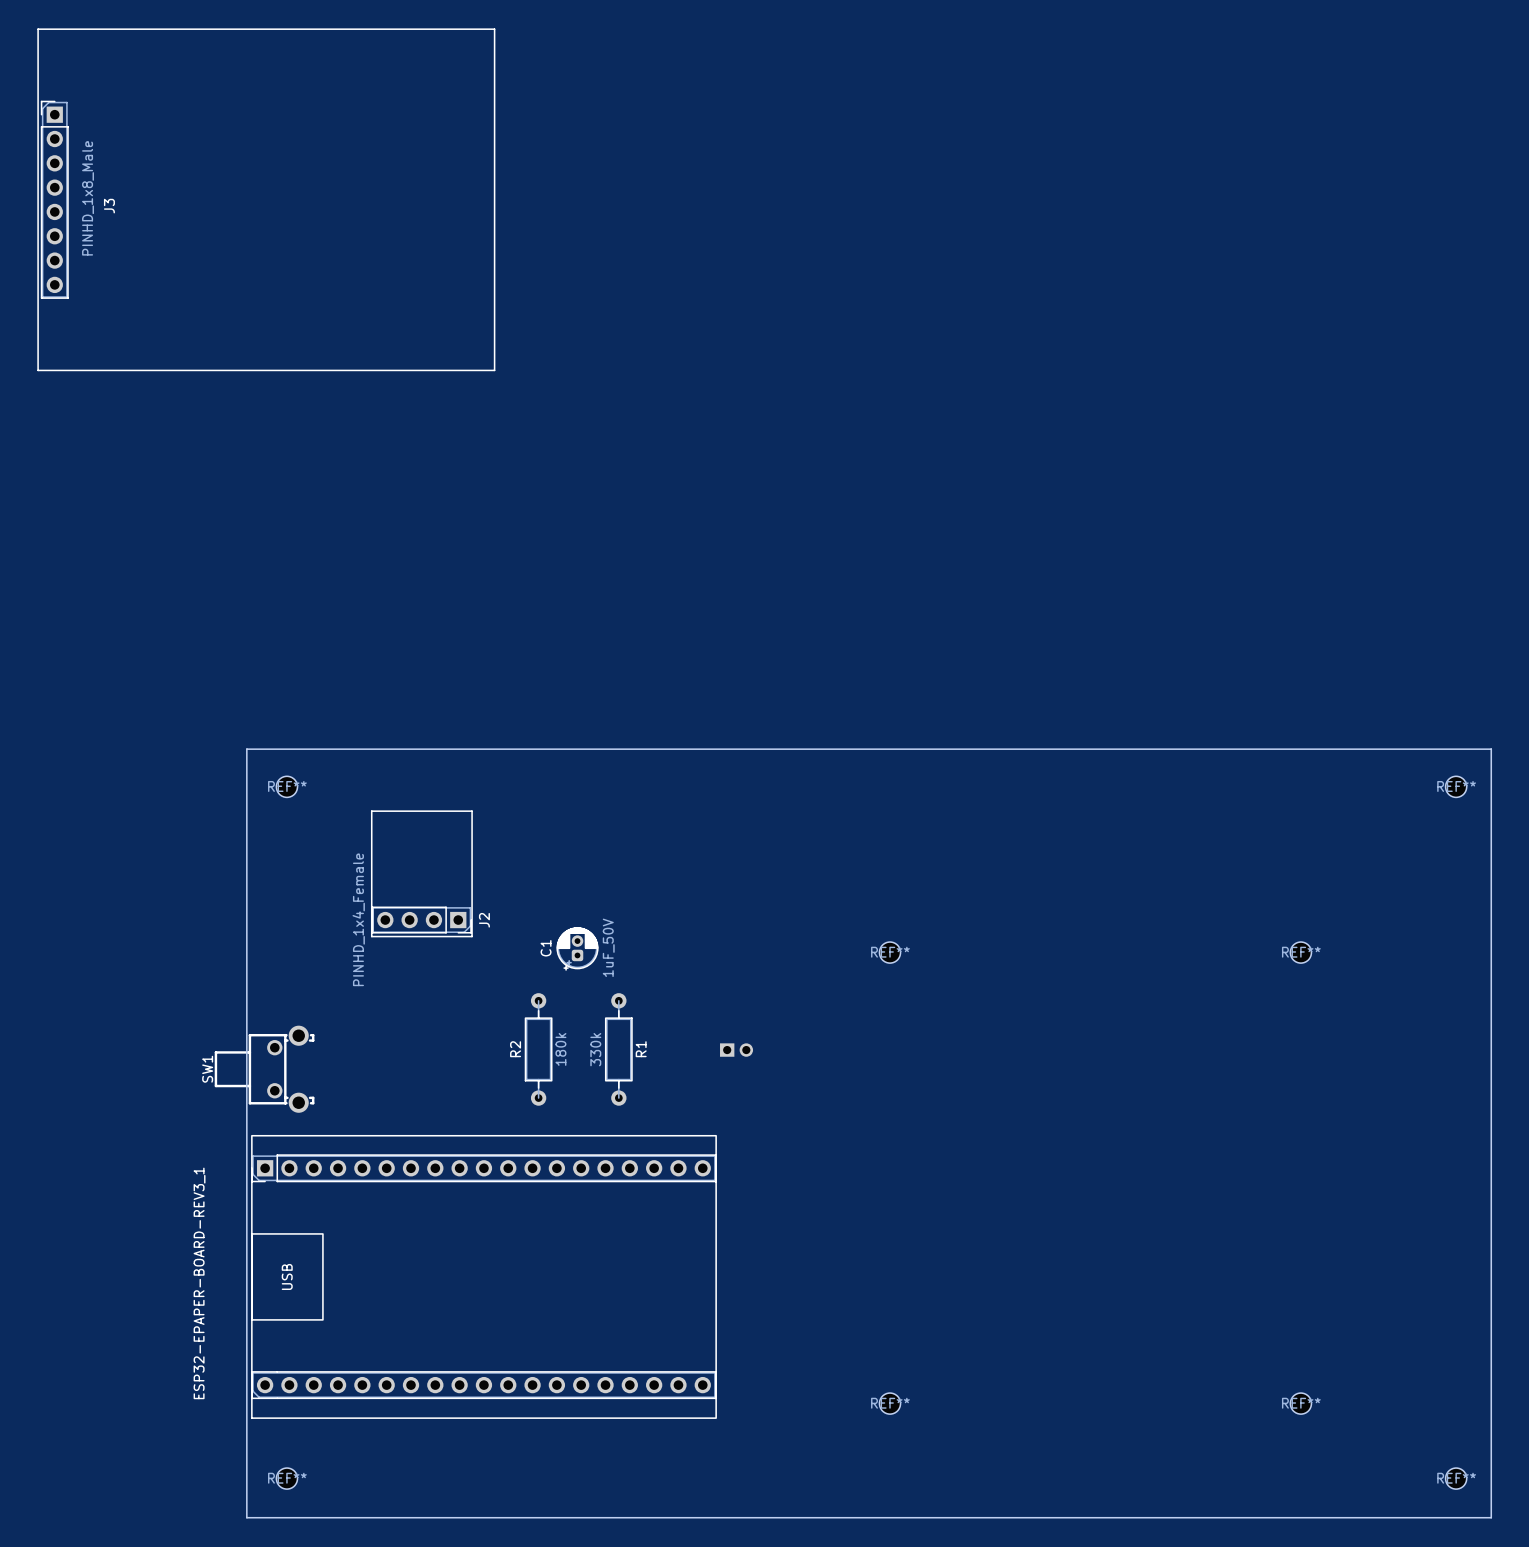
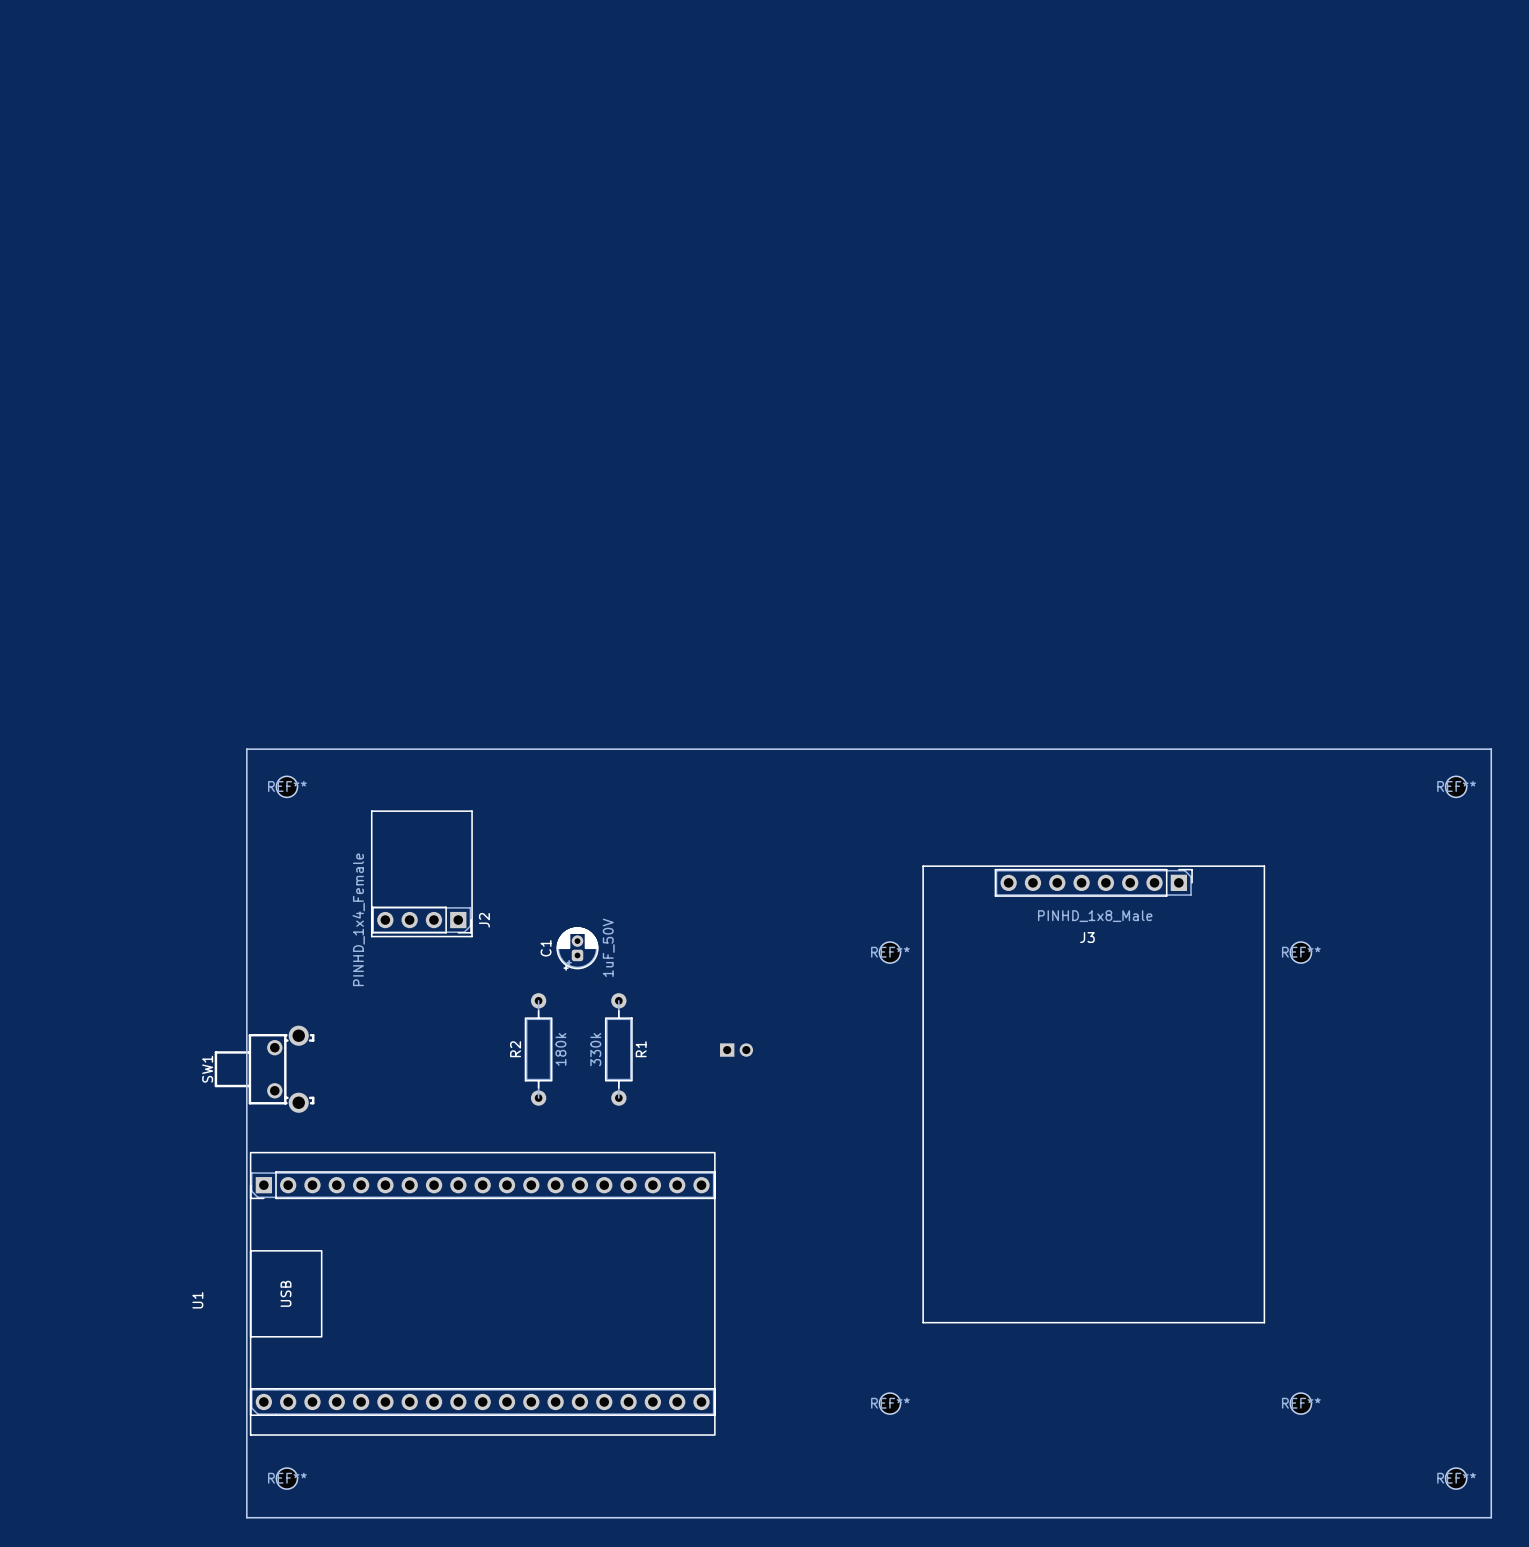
line: (38, 29) (494, 29) (494, 370) (38, 370) (38, 29) -> none
J3 rotation: 0° (54, 199) -> 90° clockwise (1093, 882)
J3 position: (54, 199) -> (1093, 882)
line: none -> (923, 866) (1264, 866) (1264, 1322) (923, 1322) (923, 866)
ESP32-EPAPER-BOARD-REV3_1: (483, 1276) -> none
U1: none -> (482, 1293)

